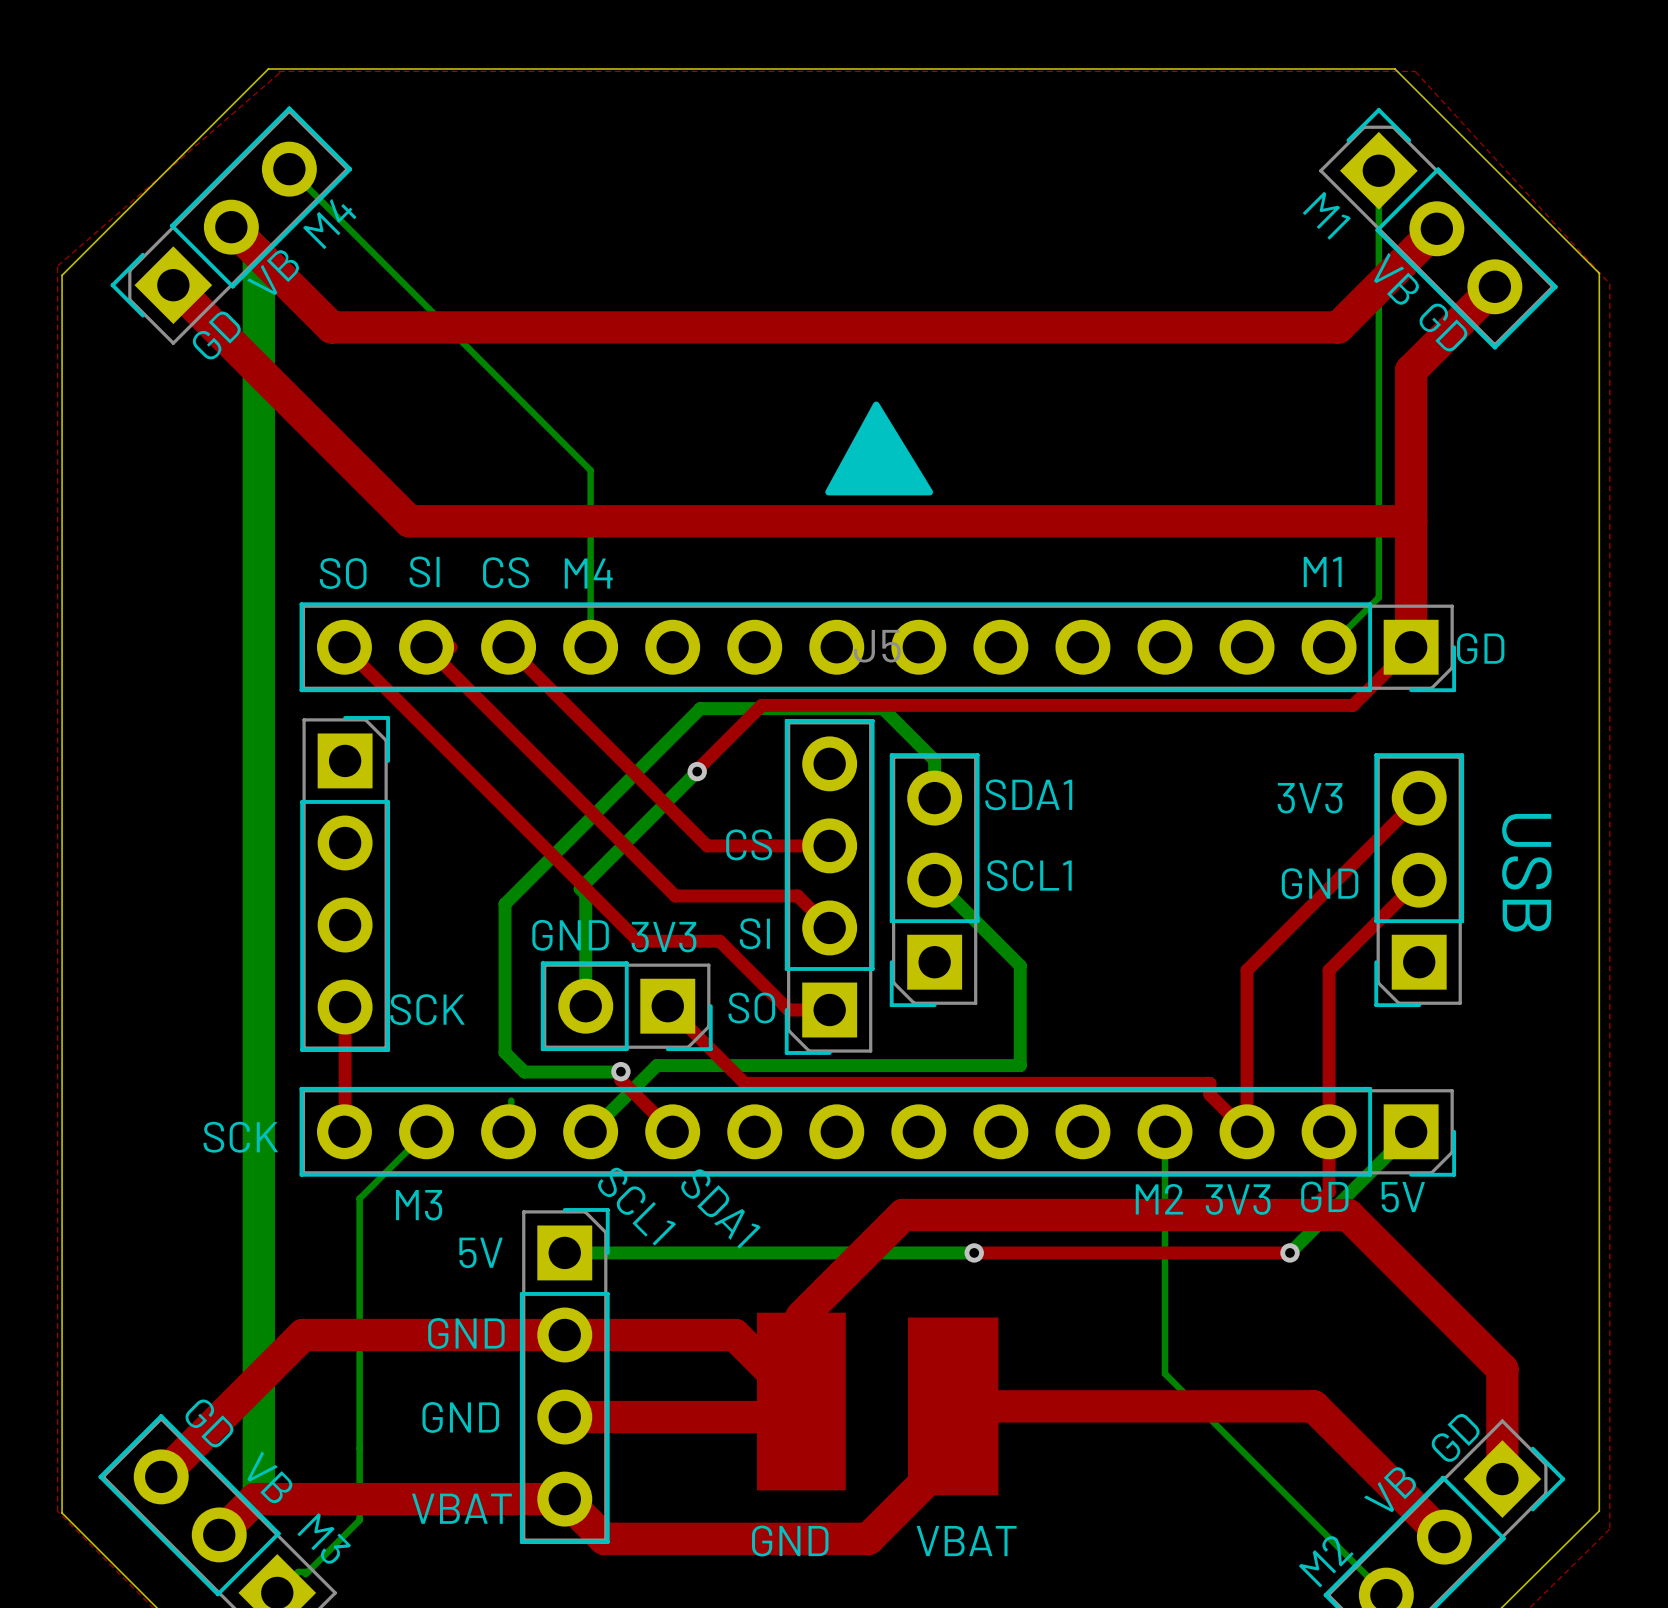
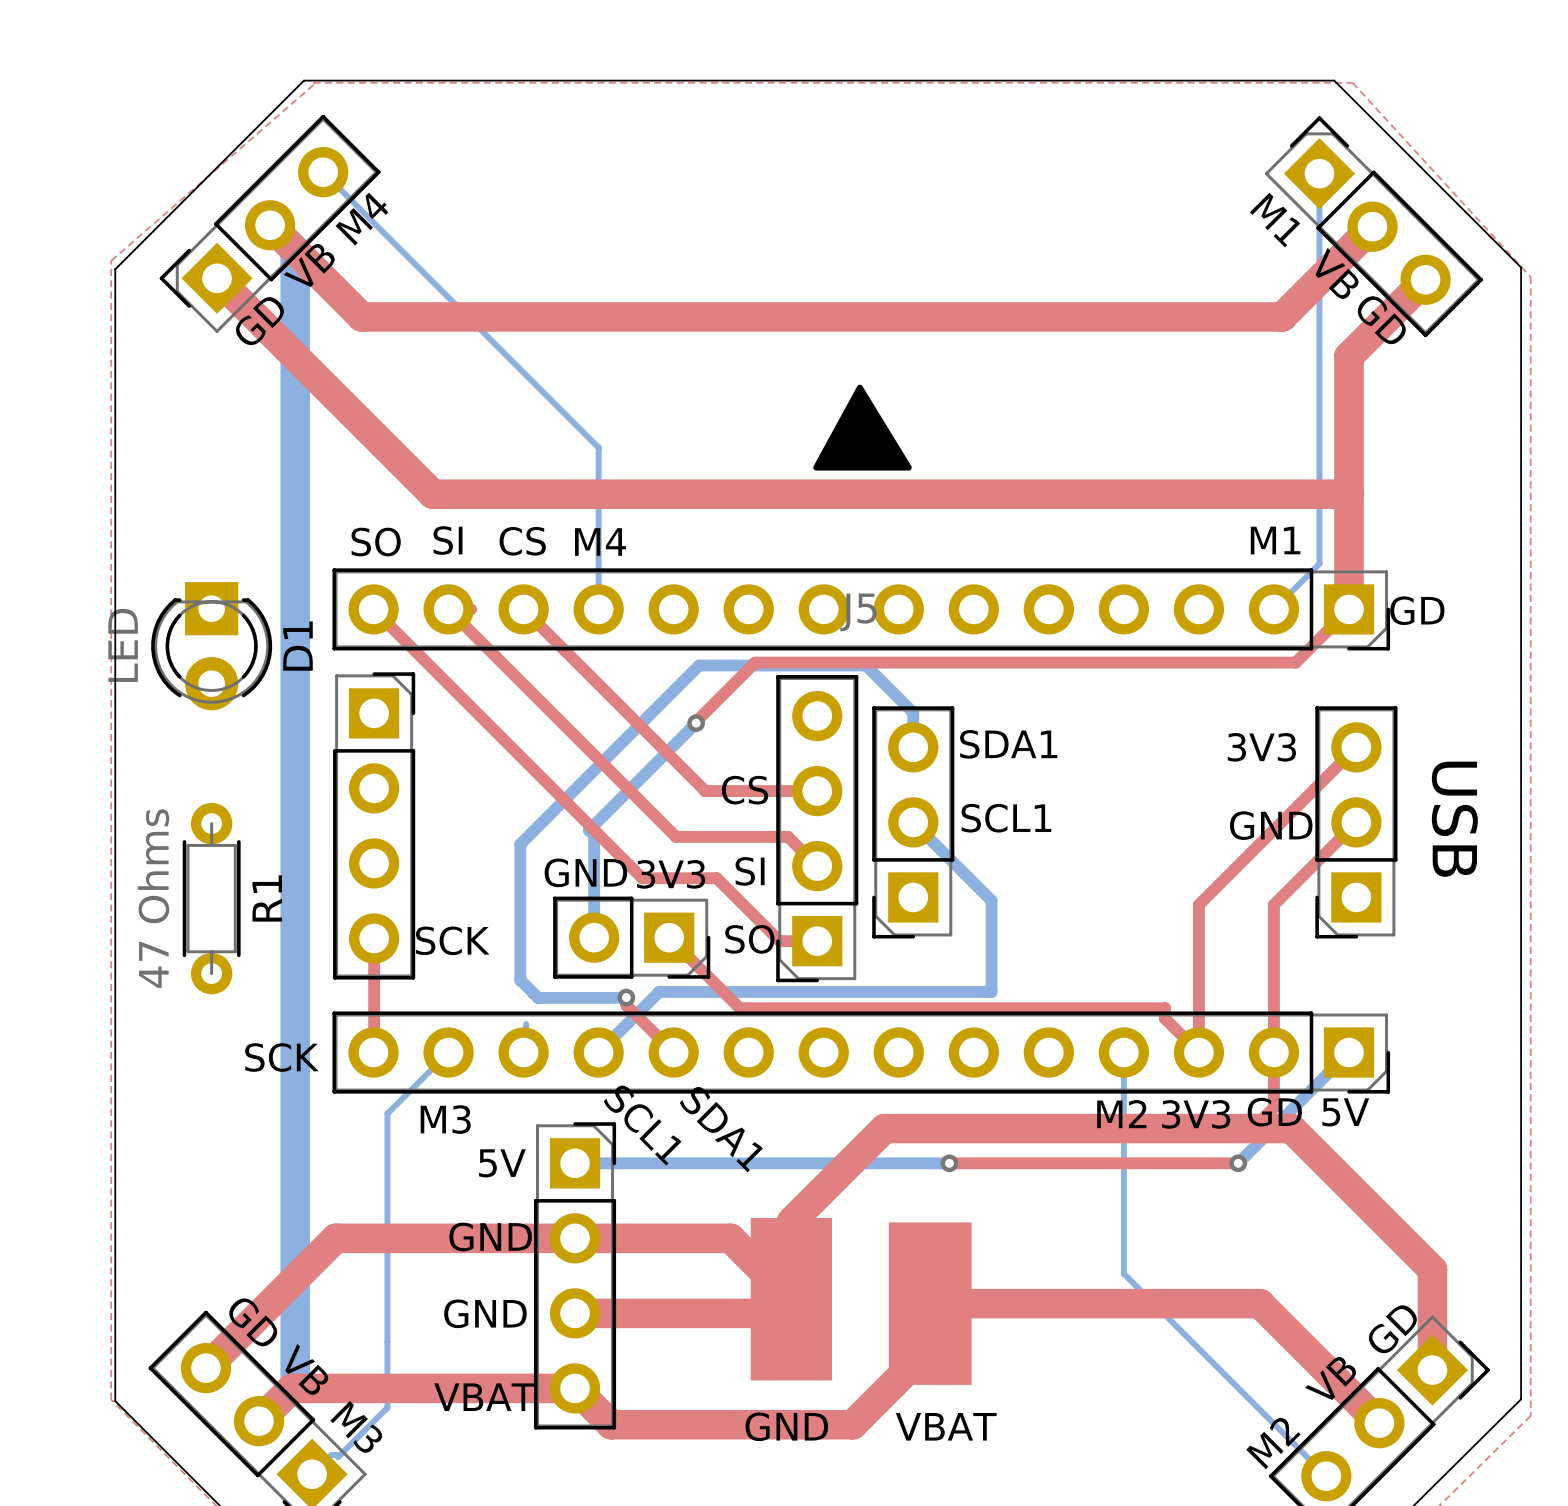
D1: none -> LED (211, 646)
R1: none -> 47 Ohms (211, 898)

